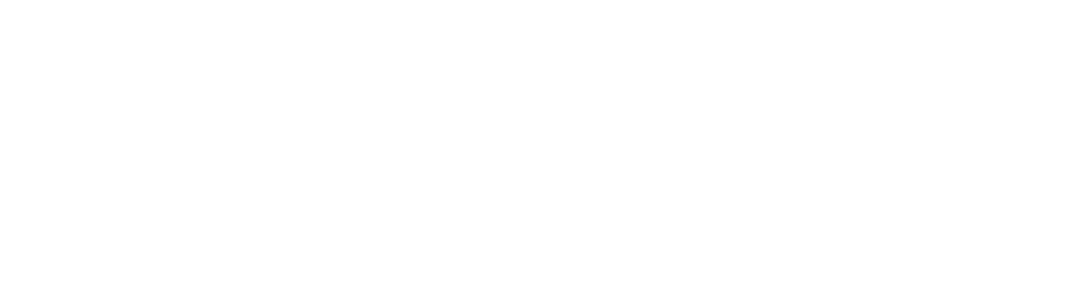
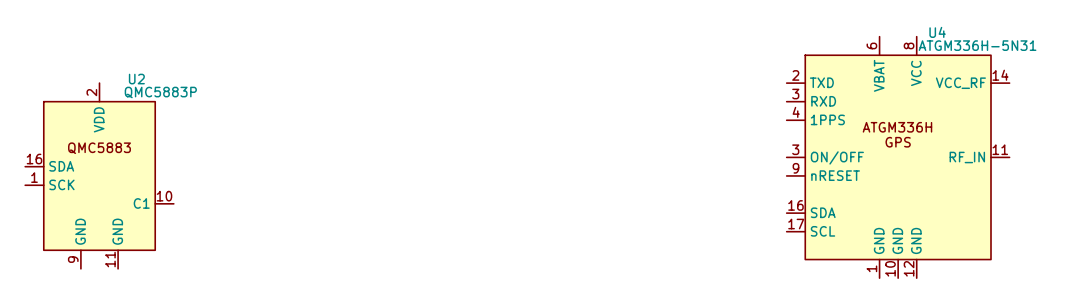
U4: none -> ATGM336H-5N31 (898, 157)
U2: none -> QMC5883P (99, 175)

